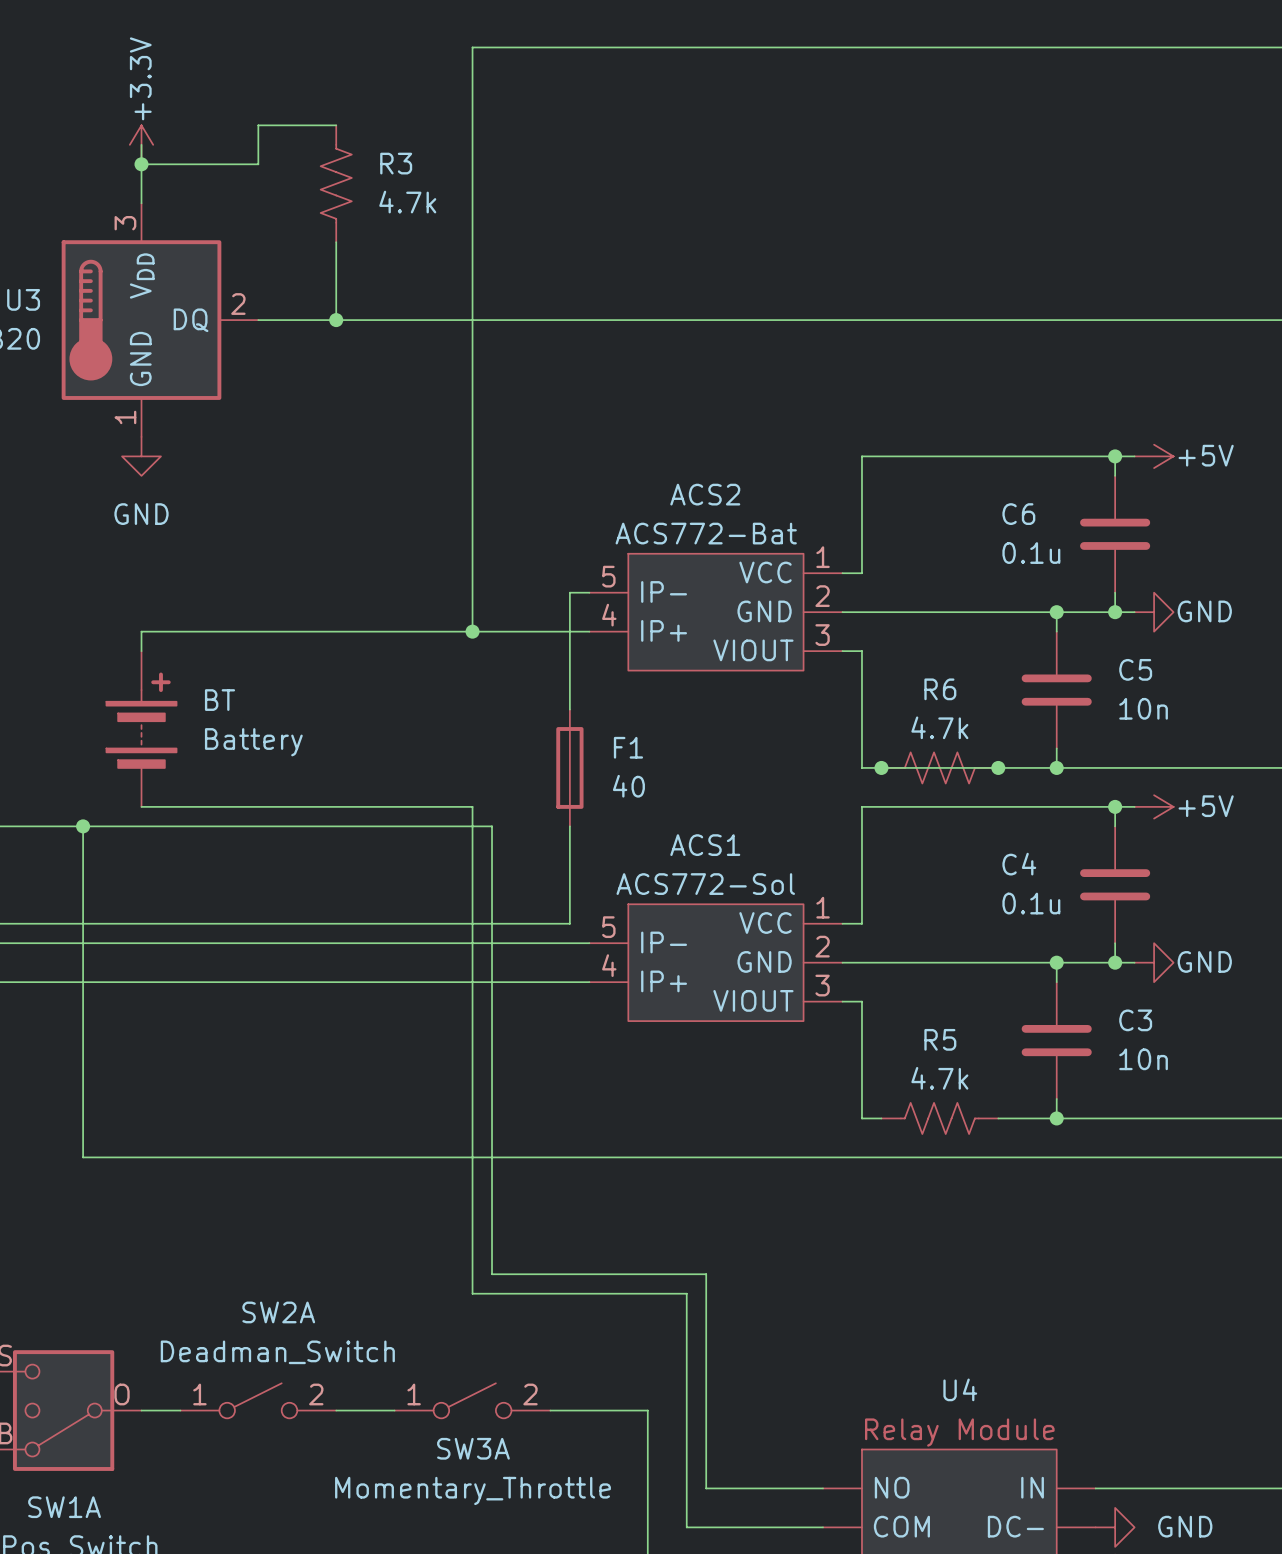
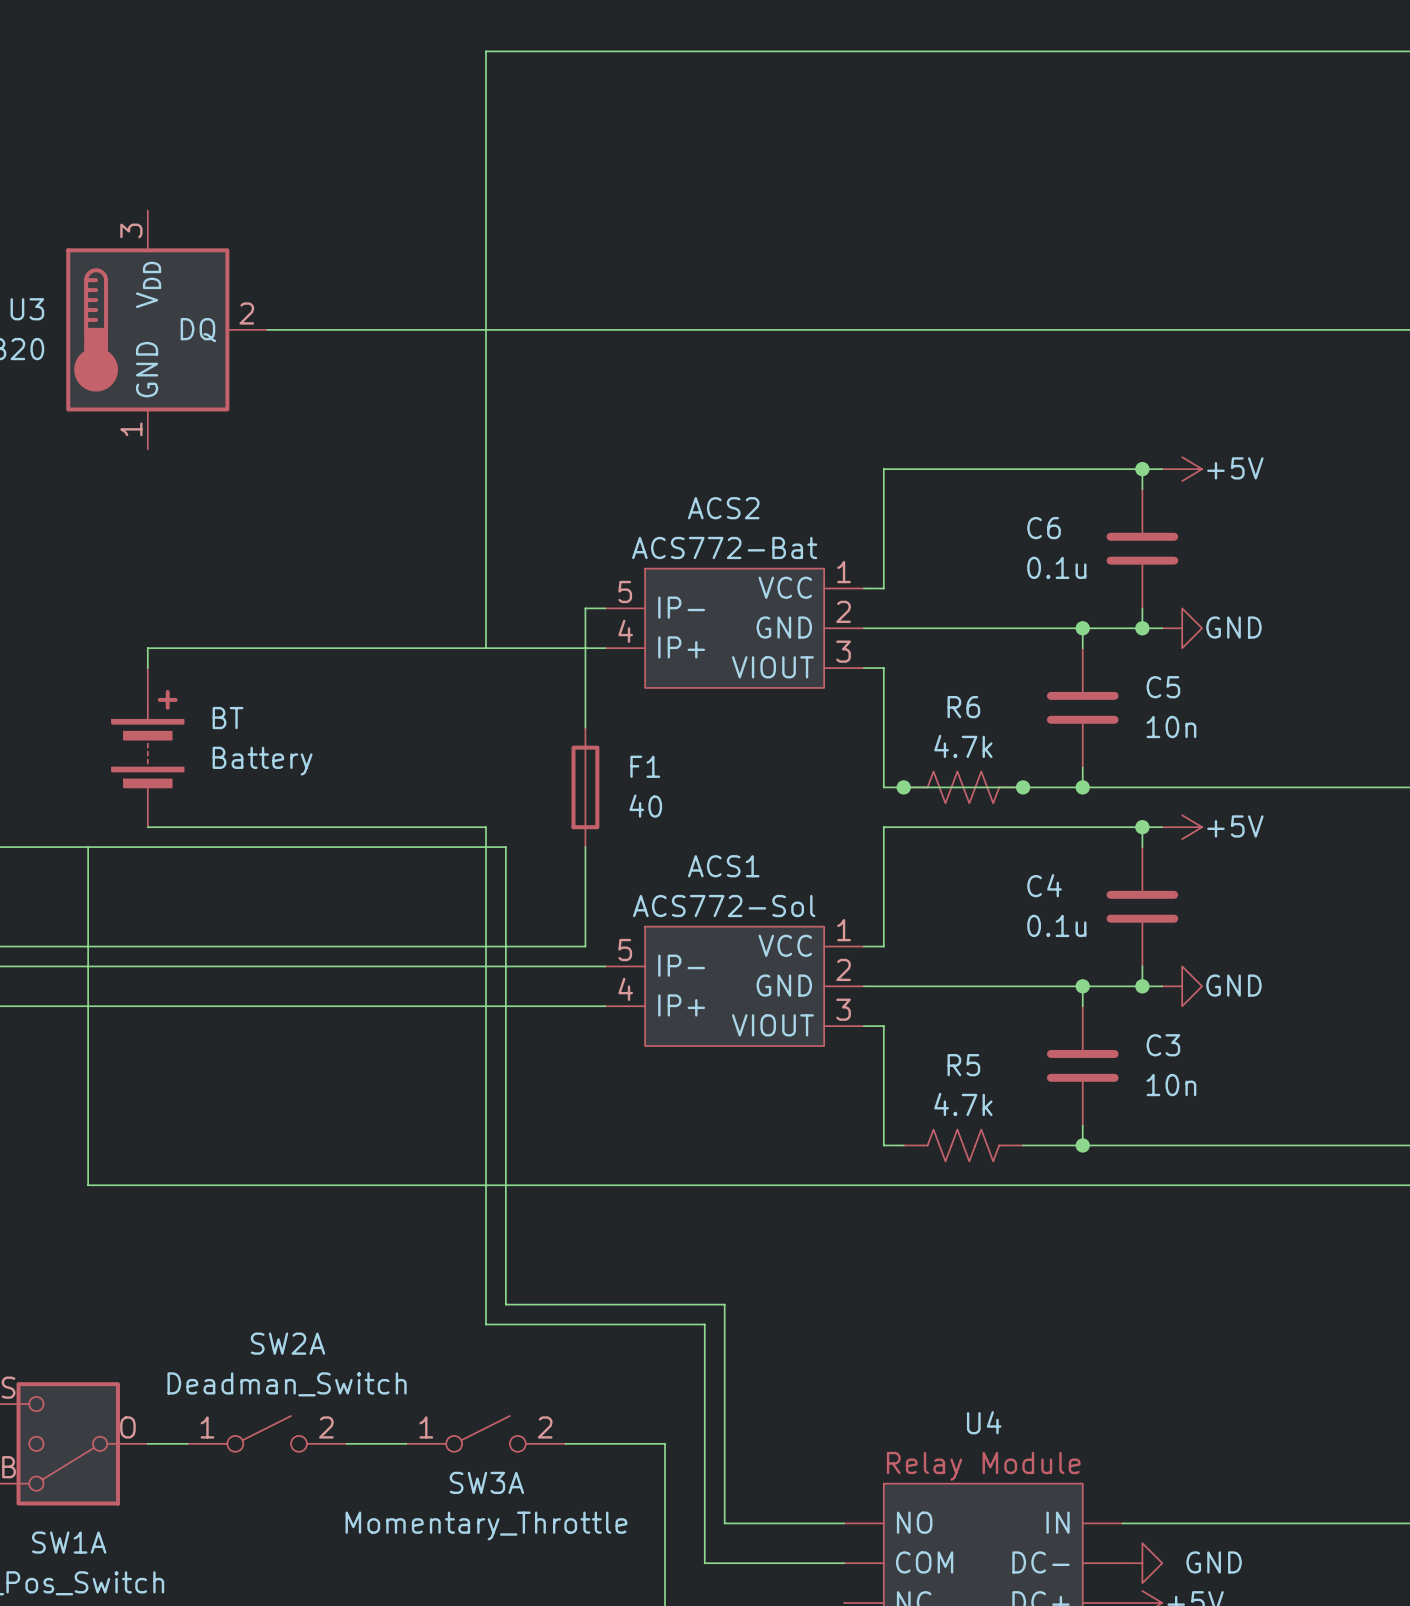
wire: (336, 125) (258, 125) (258, 164) (141, 164) -> none
wire: (141, 144) (141, 203) -> none
power symbol: +3.3V (141, 144) -> none
junction: (141, 164) -> none
R3: 4.7k (336, 183) -> none
wire: (336, 242) (336, 320) -> none
junction: (336, 320) -> none
power symbol: GND (141, 456) -> none
junction: (472, 631) -> none
junction: (83, 826) -> none

